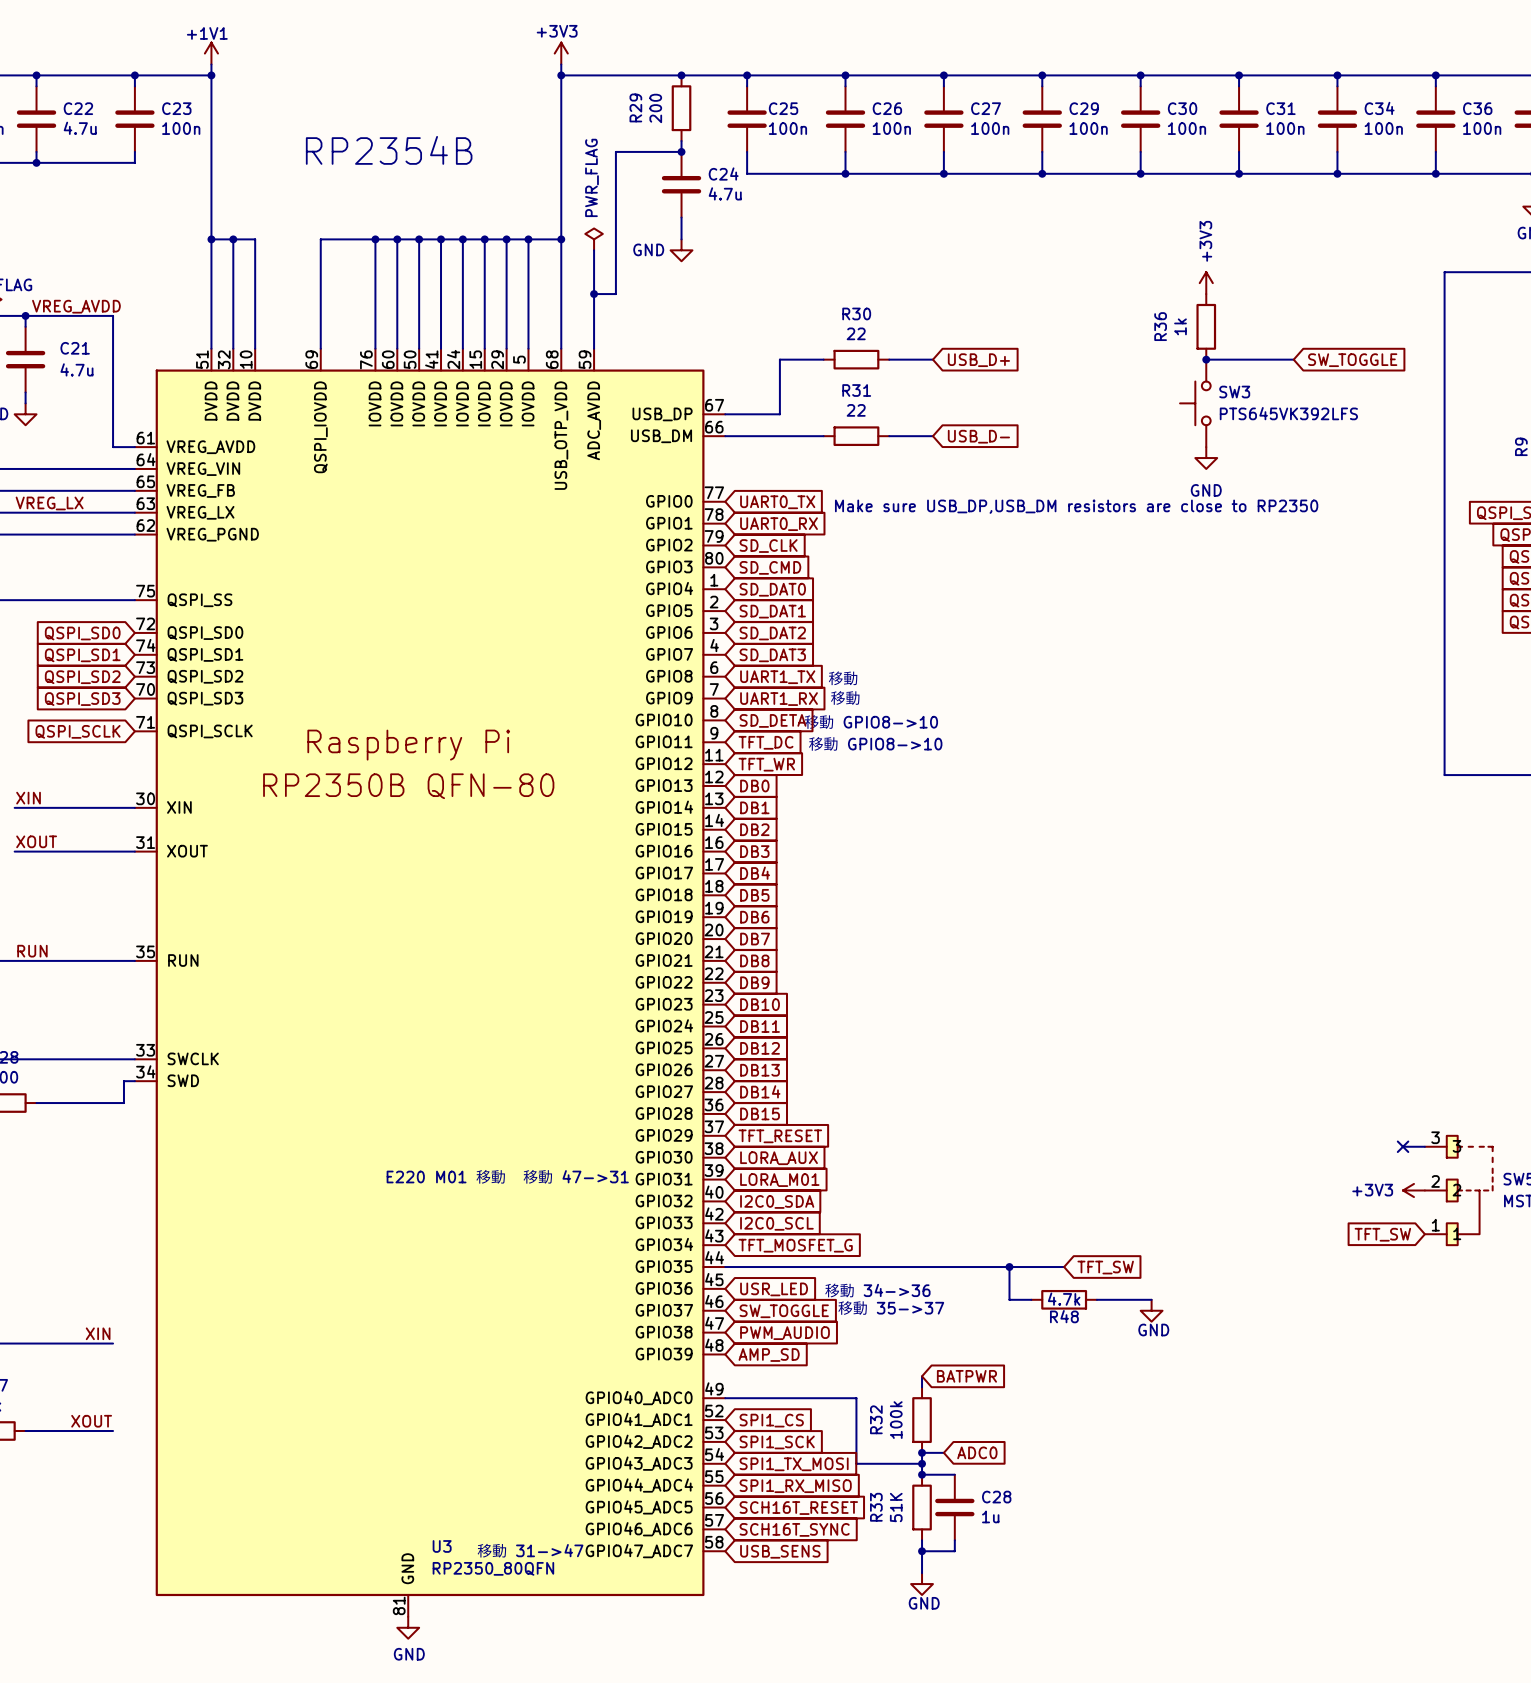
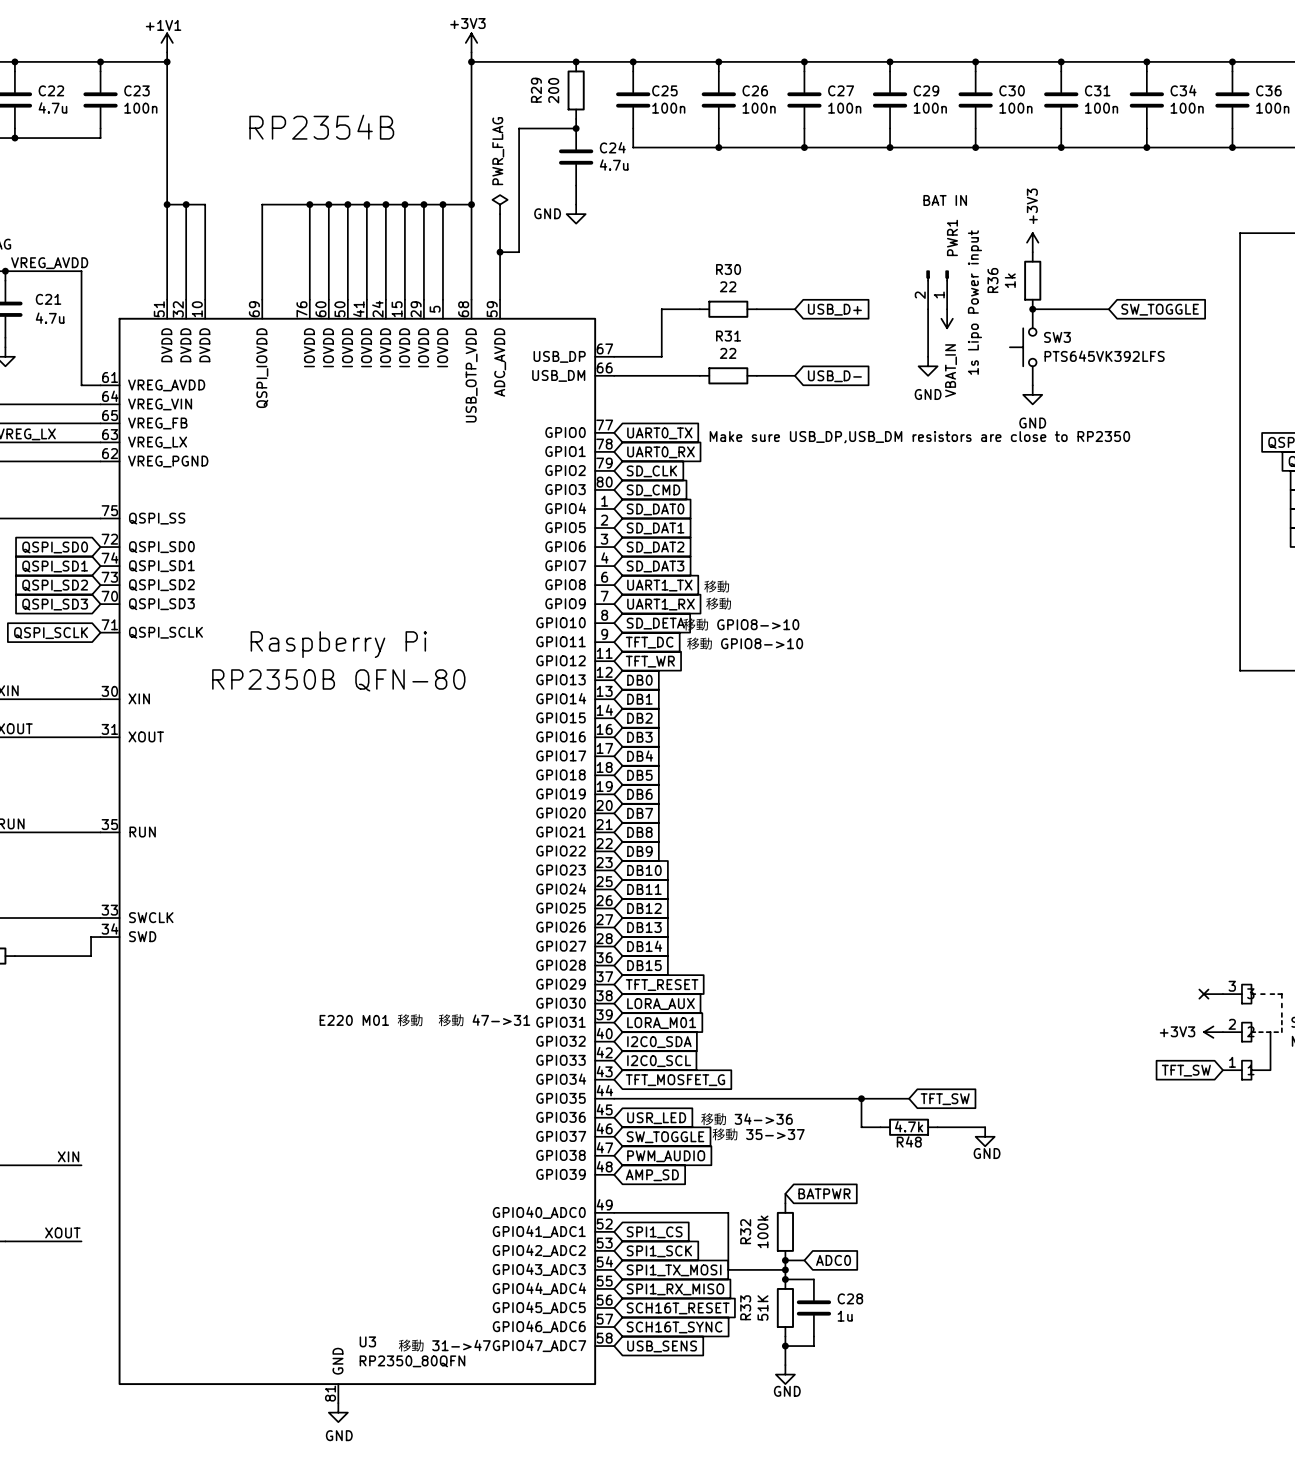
text: none -> BAT IN (945, 200)
PWR1: none -> 1s Lipo Power input (937, 289)
wire: none -> (928, 309) (928, 356)
power symbol: none -> VBAT_IN (947, 318)
power symbol: none -> GND (928, 366)

